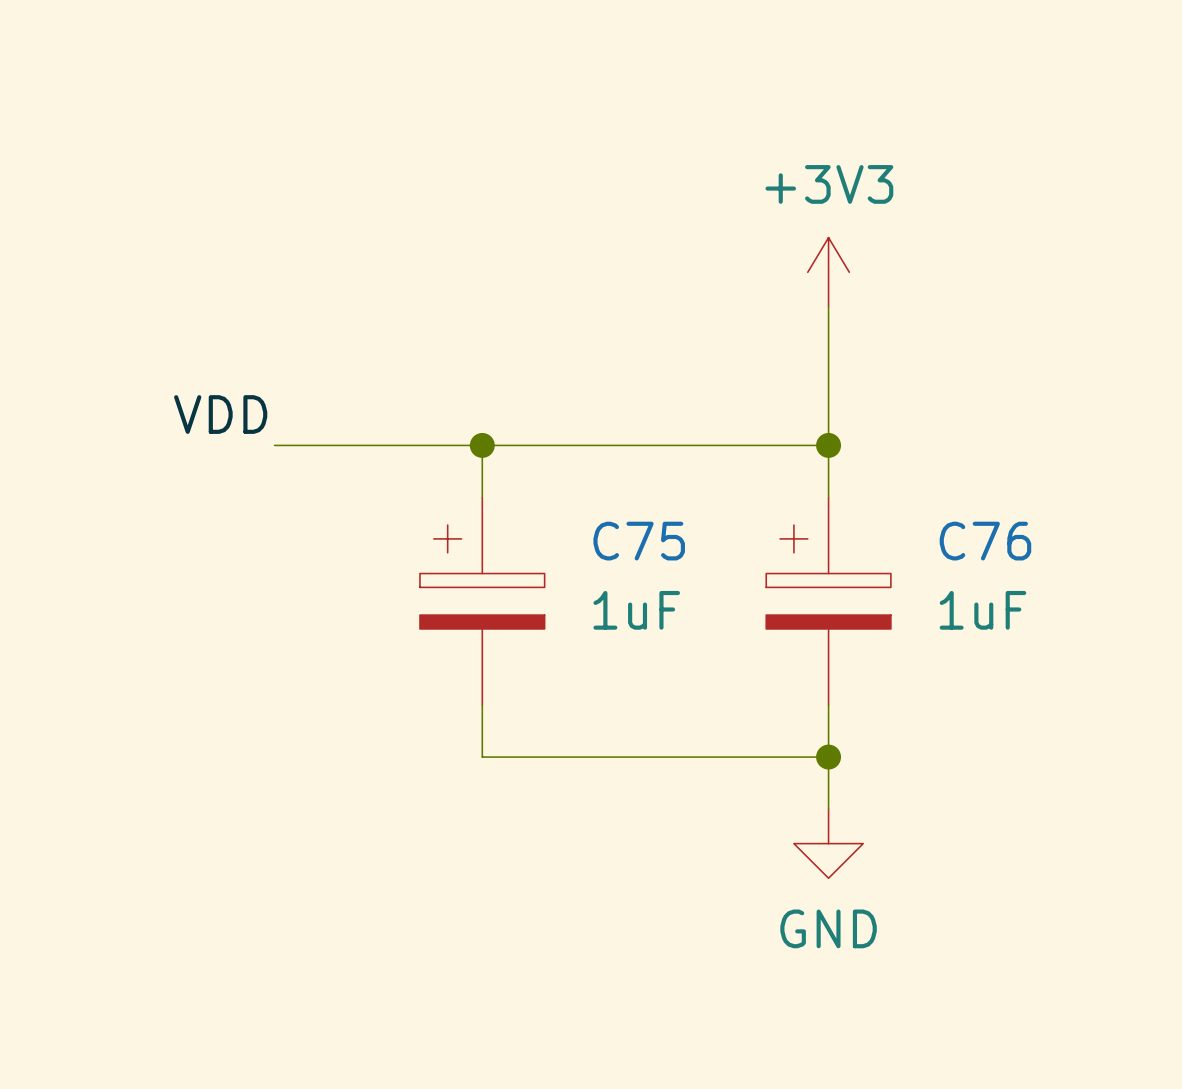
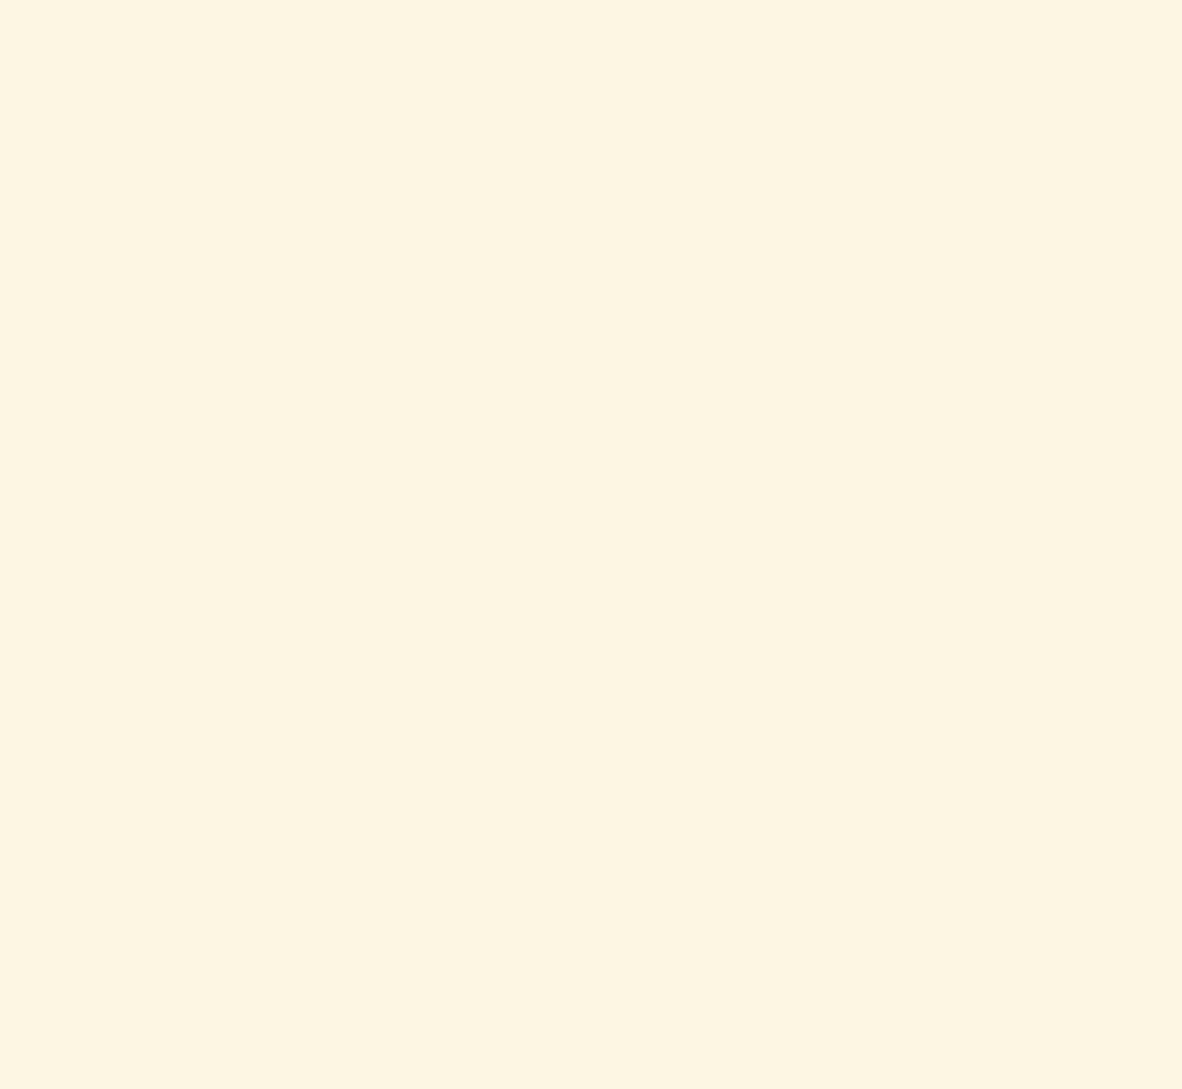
power symbol: +3V3 (828, 272) -> none
wire: (828, 306) (828, 497) -> none
label: VDD (220, 414) -> none
wire: (274, 445) (828, 445) -> none
wire: (482, 445) (482, 497) -> none
junction: (482, 445) -> none
junction: (828, 445) -> none
C75: 1uF (482, 601) -> none
C76: 1uF (828, 601) -> none
wire: (482, 705) (482, 757) (828, 757) -> none
wire: (828, 705) (828, 808) -> none
junction: (828, 757) -> none
power symbol: GND (828, 843) -> none

